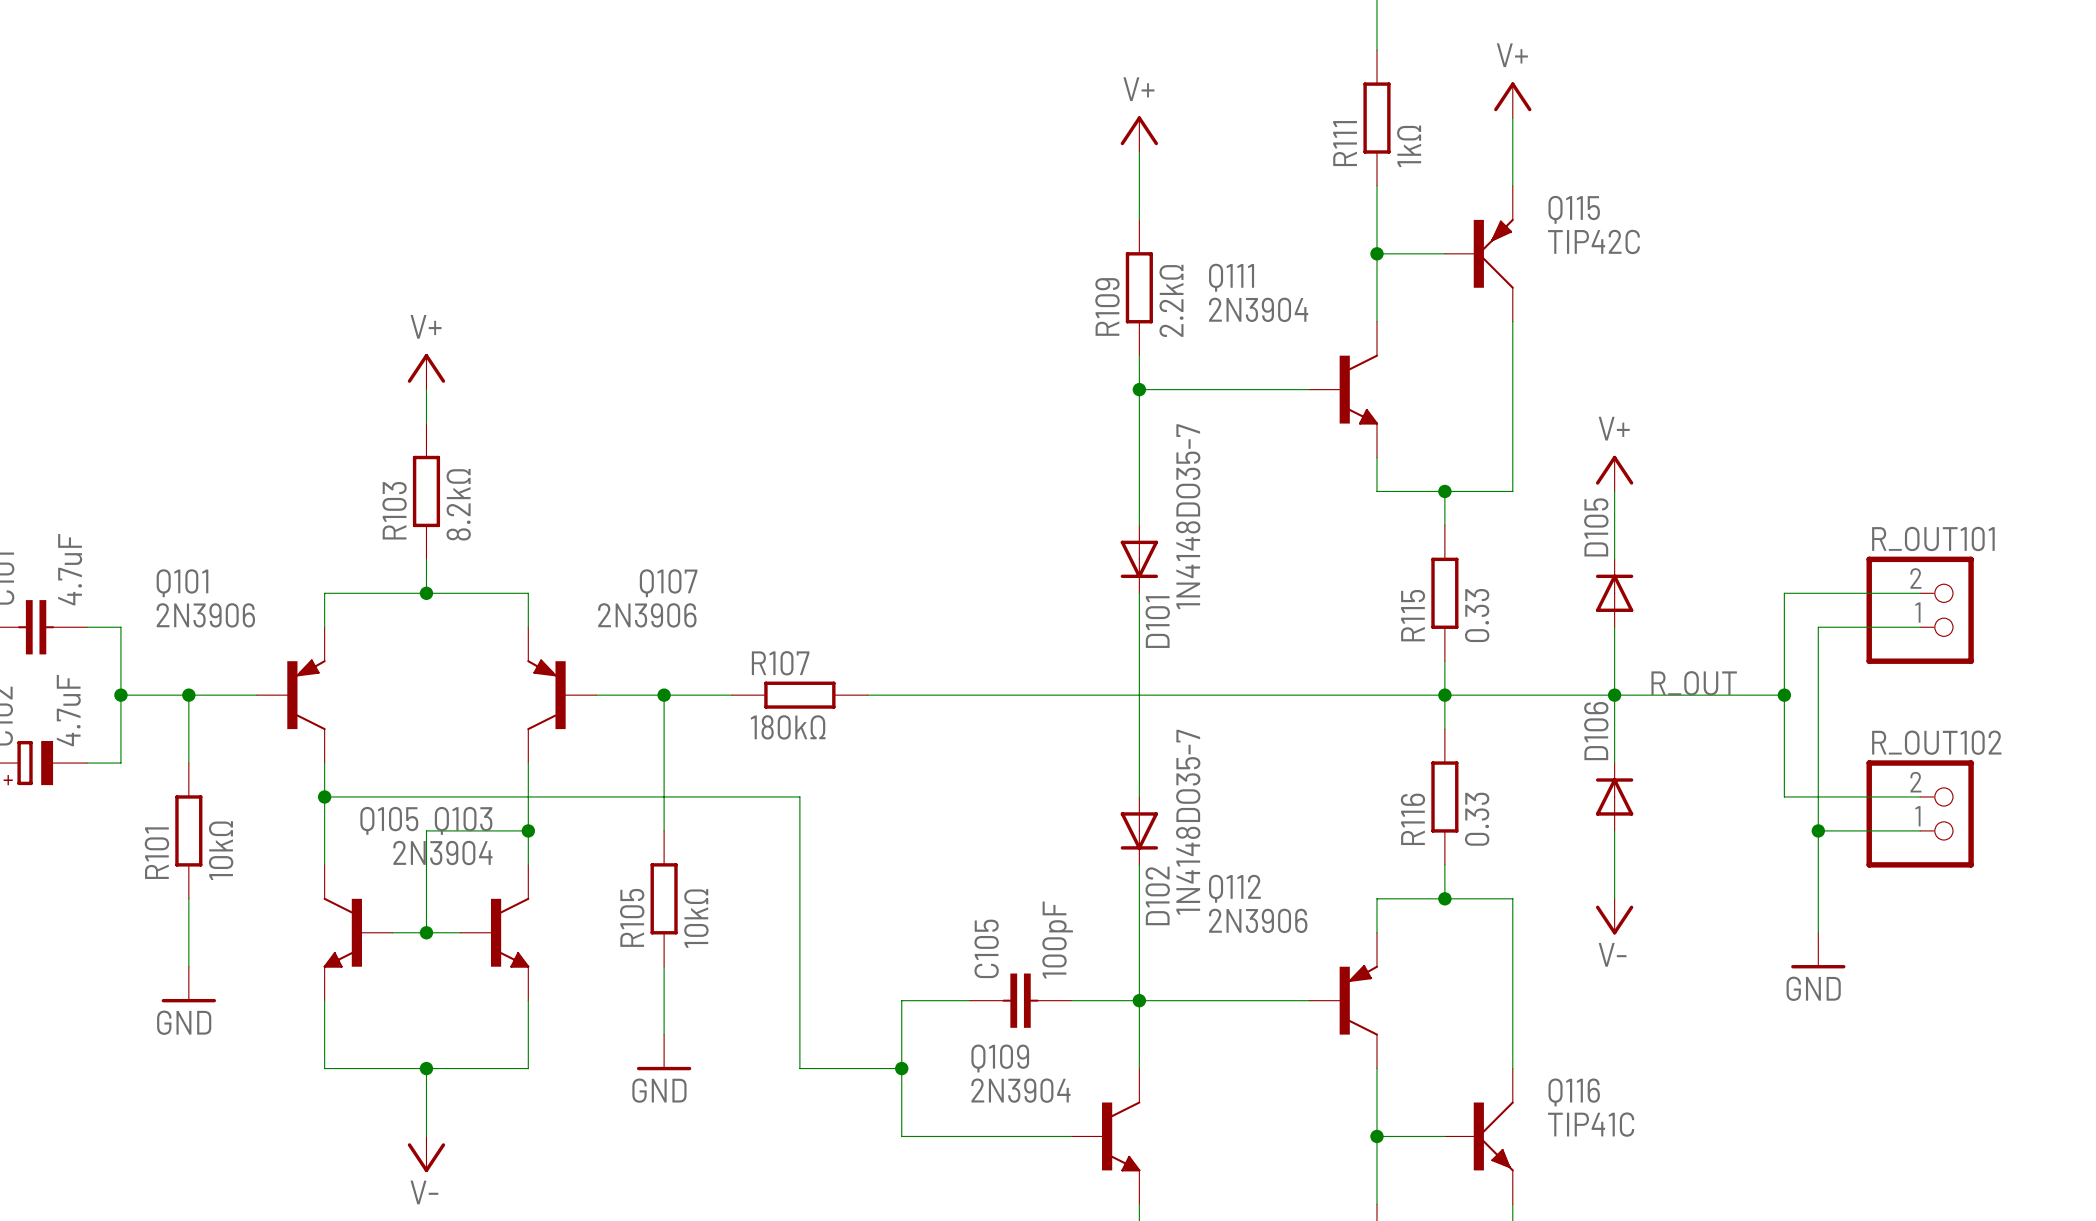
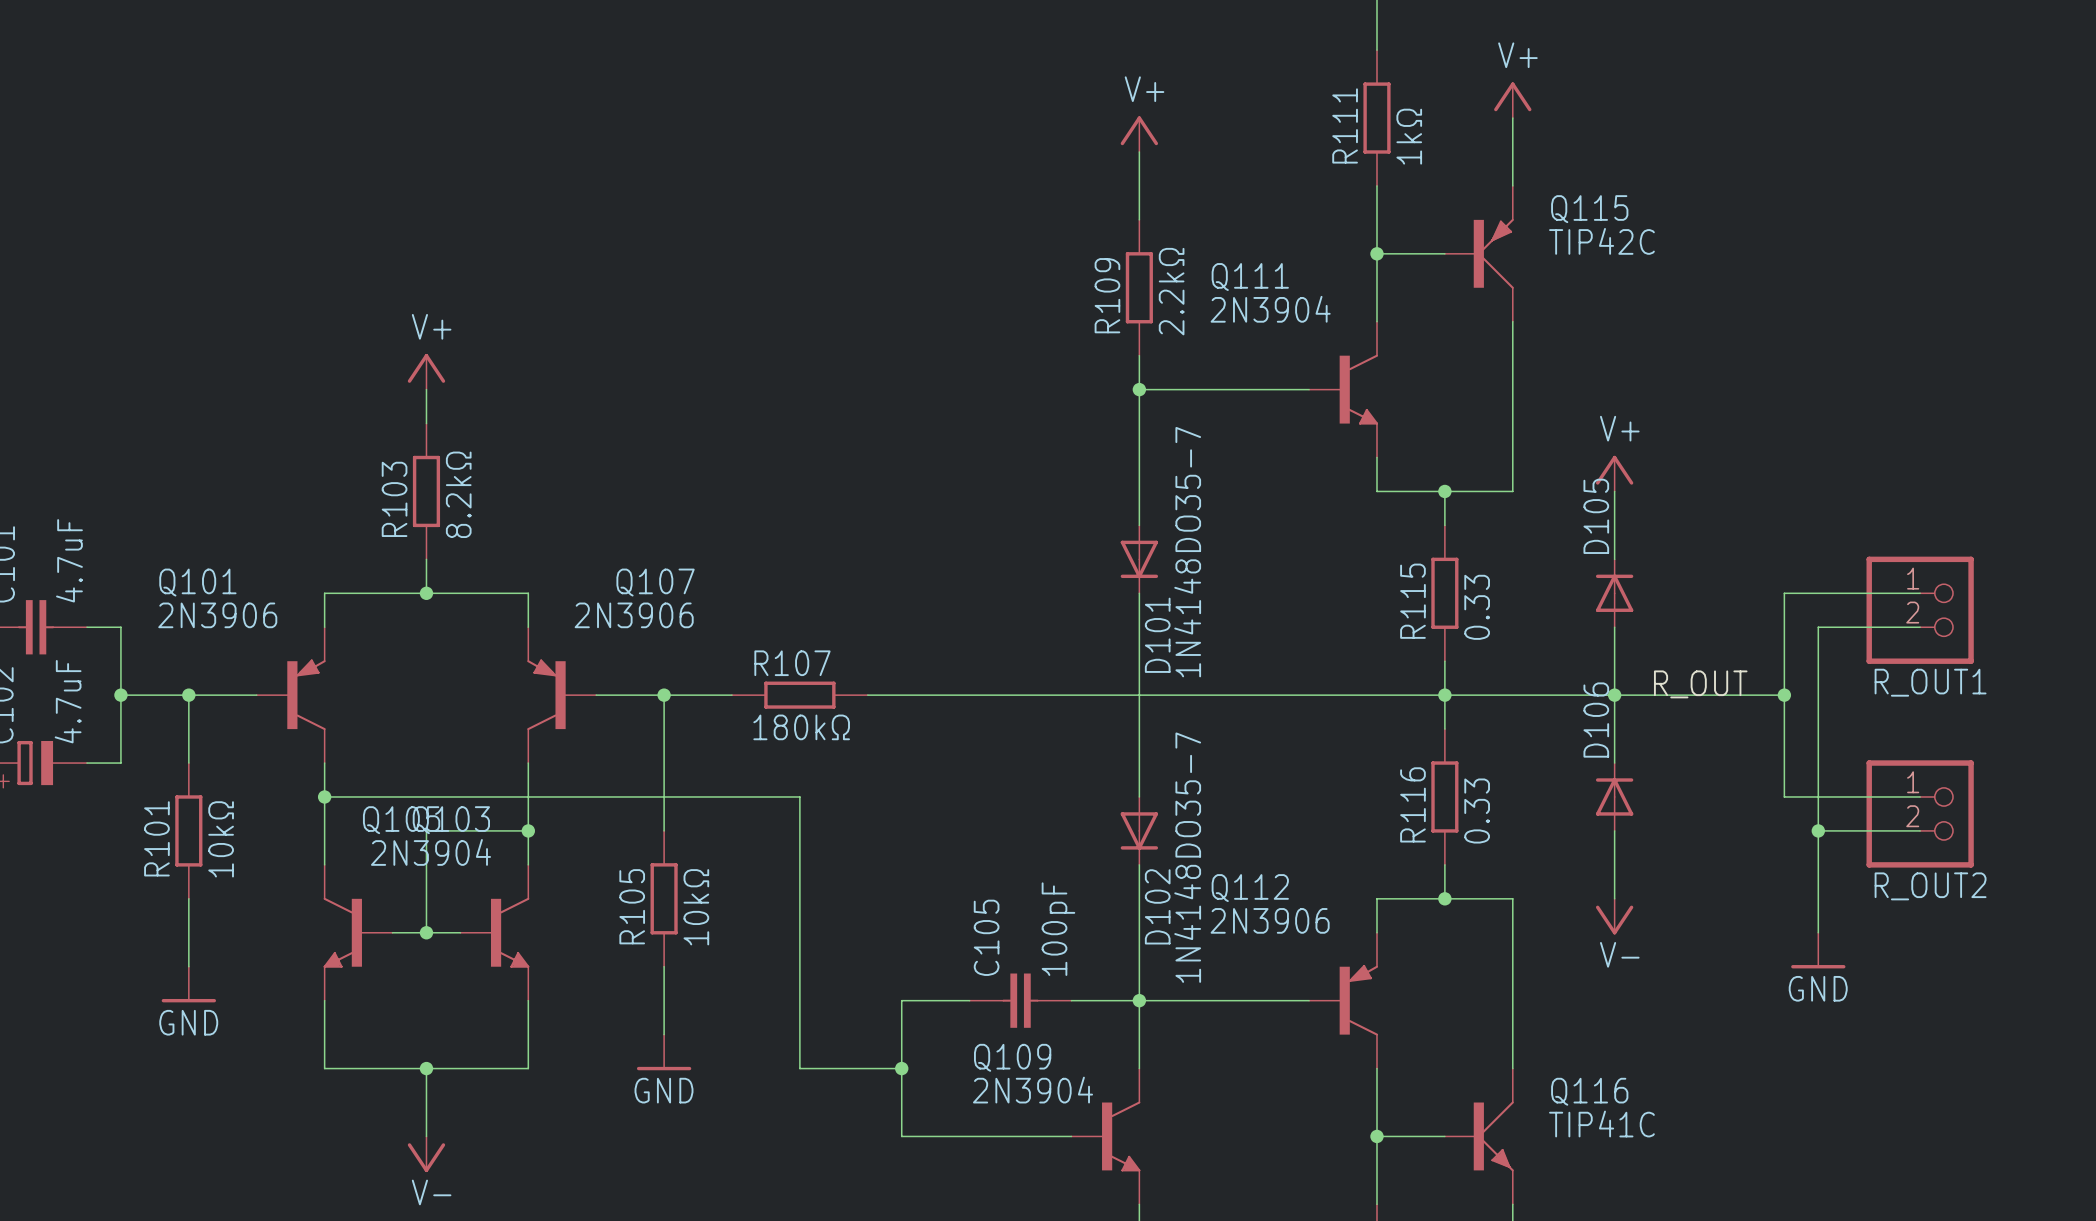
R_OUT101 name: R_OUT101 (1933, 539) -> R_OUT1 (1930, 682)
R_OUT101 flip: as is (1920, 610) -> up-down (1920, 610)
R_OUT102 name: R_OUT102 (1936, 742) -> R_OUT2 (1930, 886)
R_OUT102 flip: as is (1920, 813) -> up-down (1920, 813)

